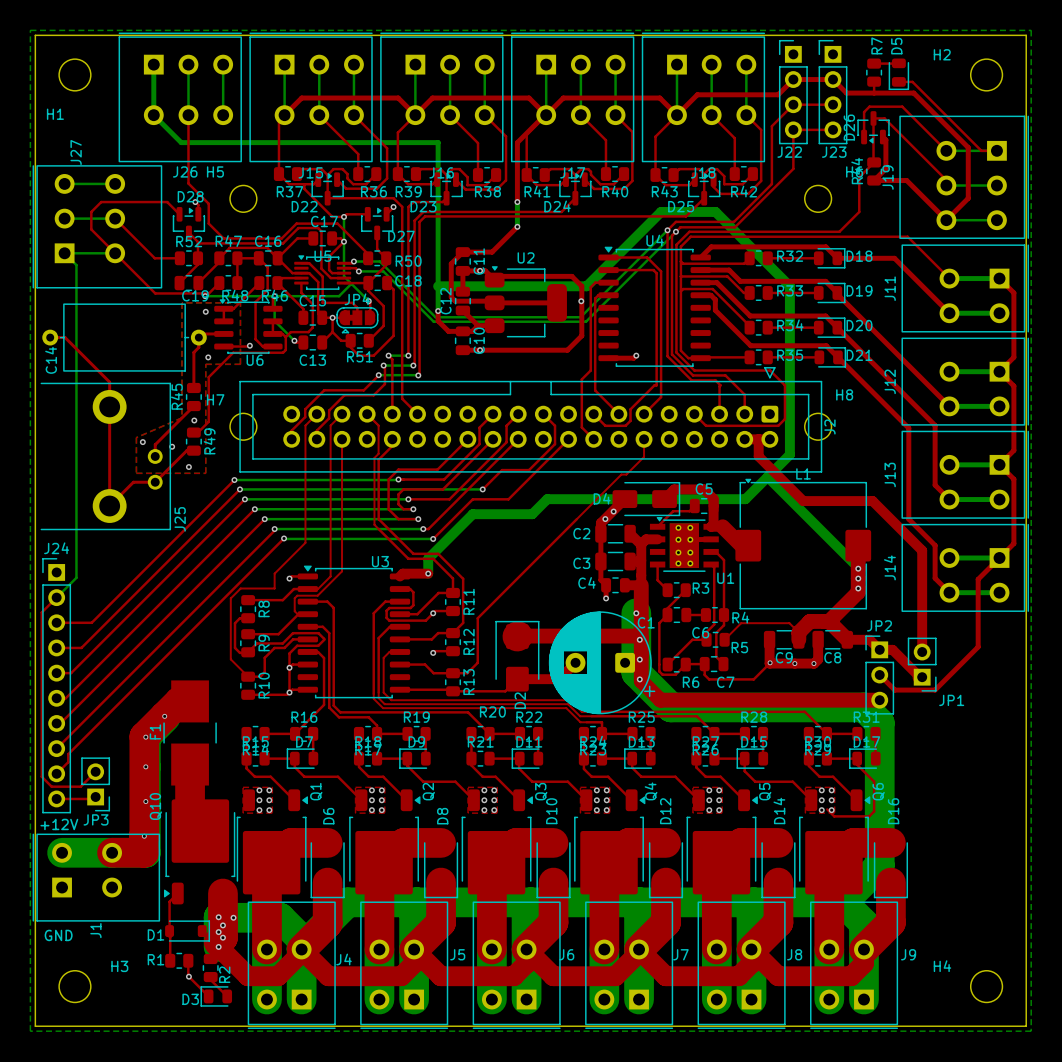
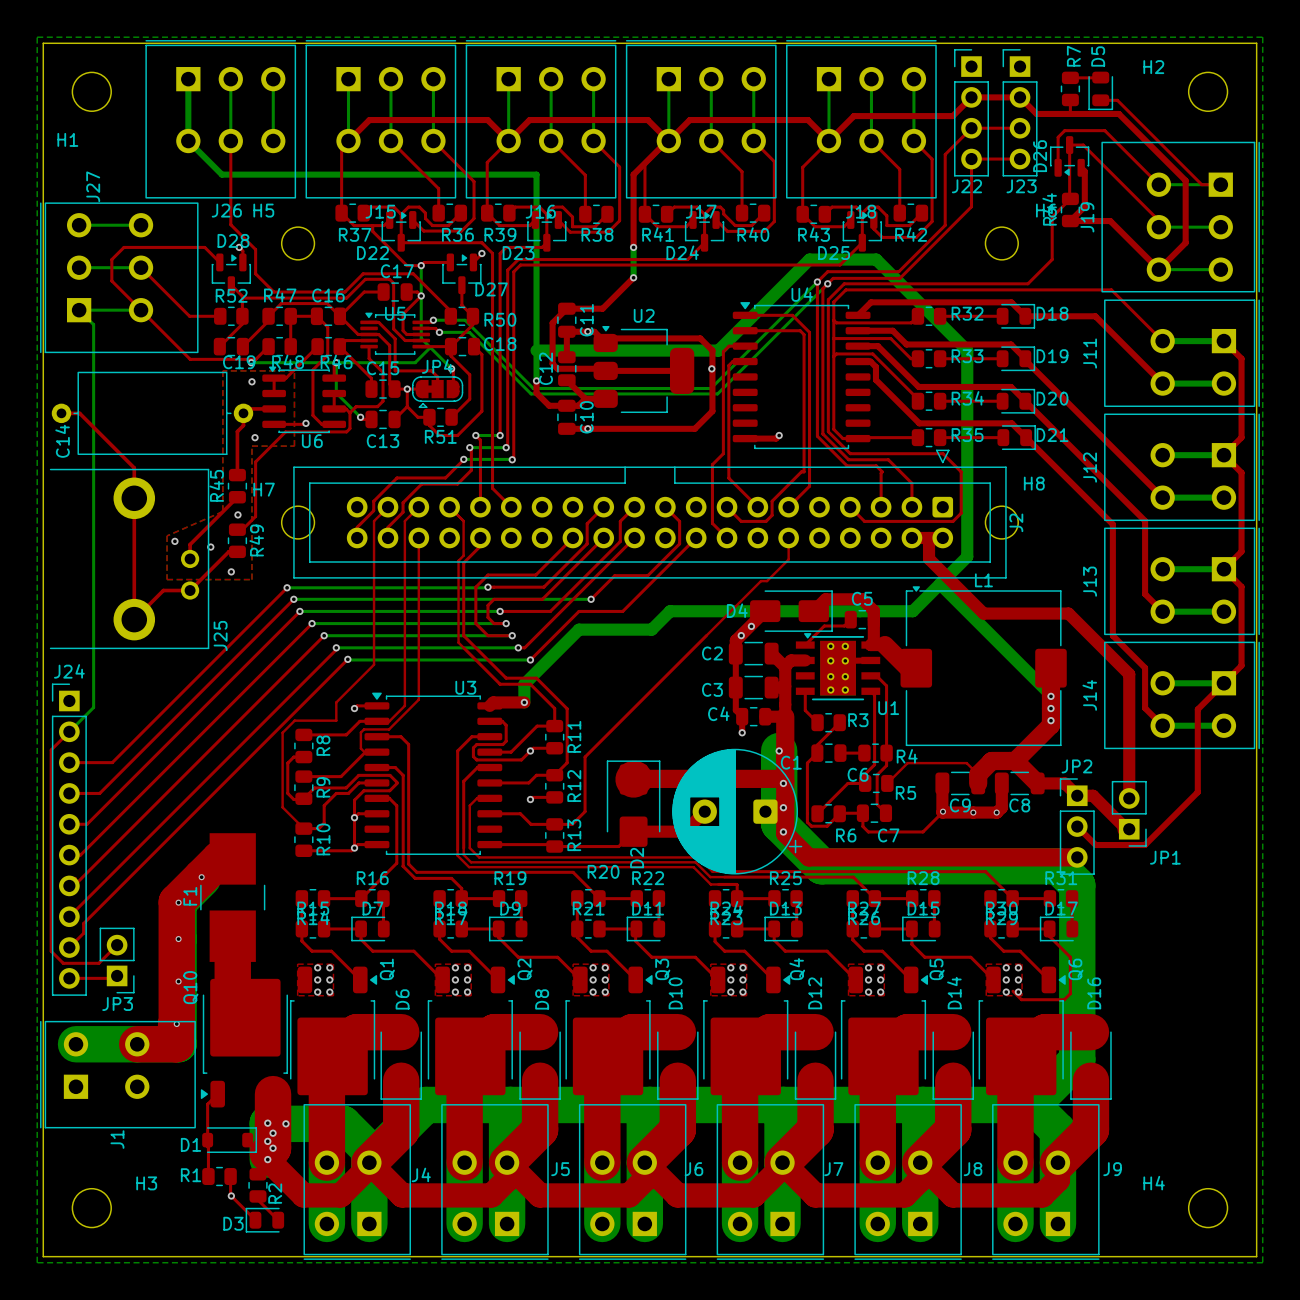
text: +12V (59, 824) -> none
text: GND (58, 935) -> none

